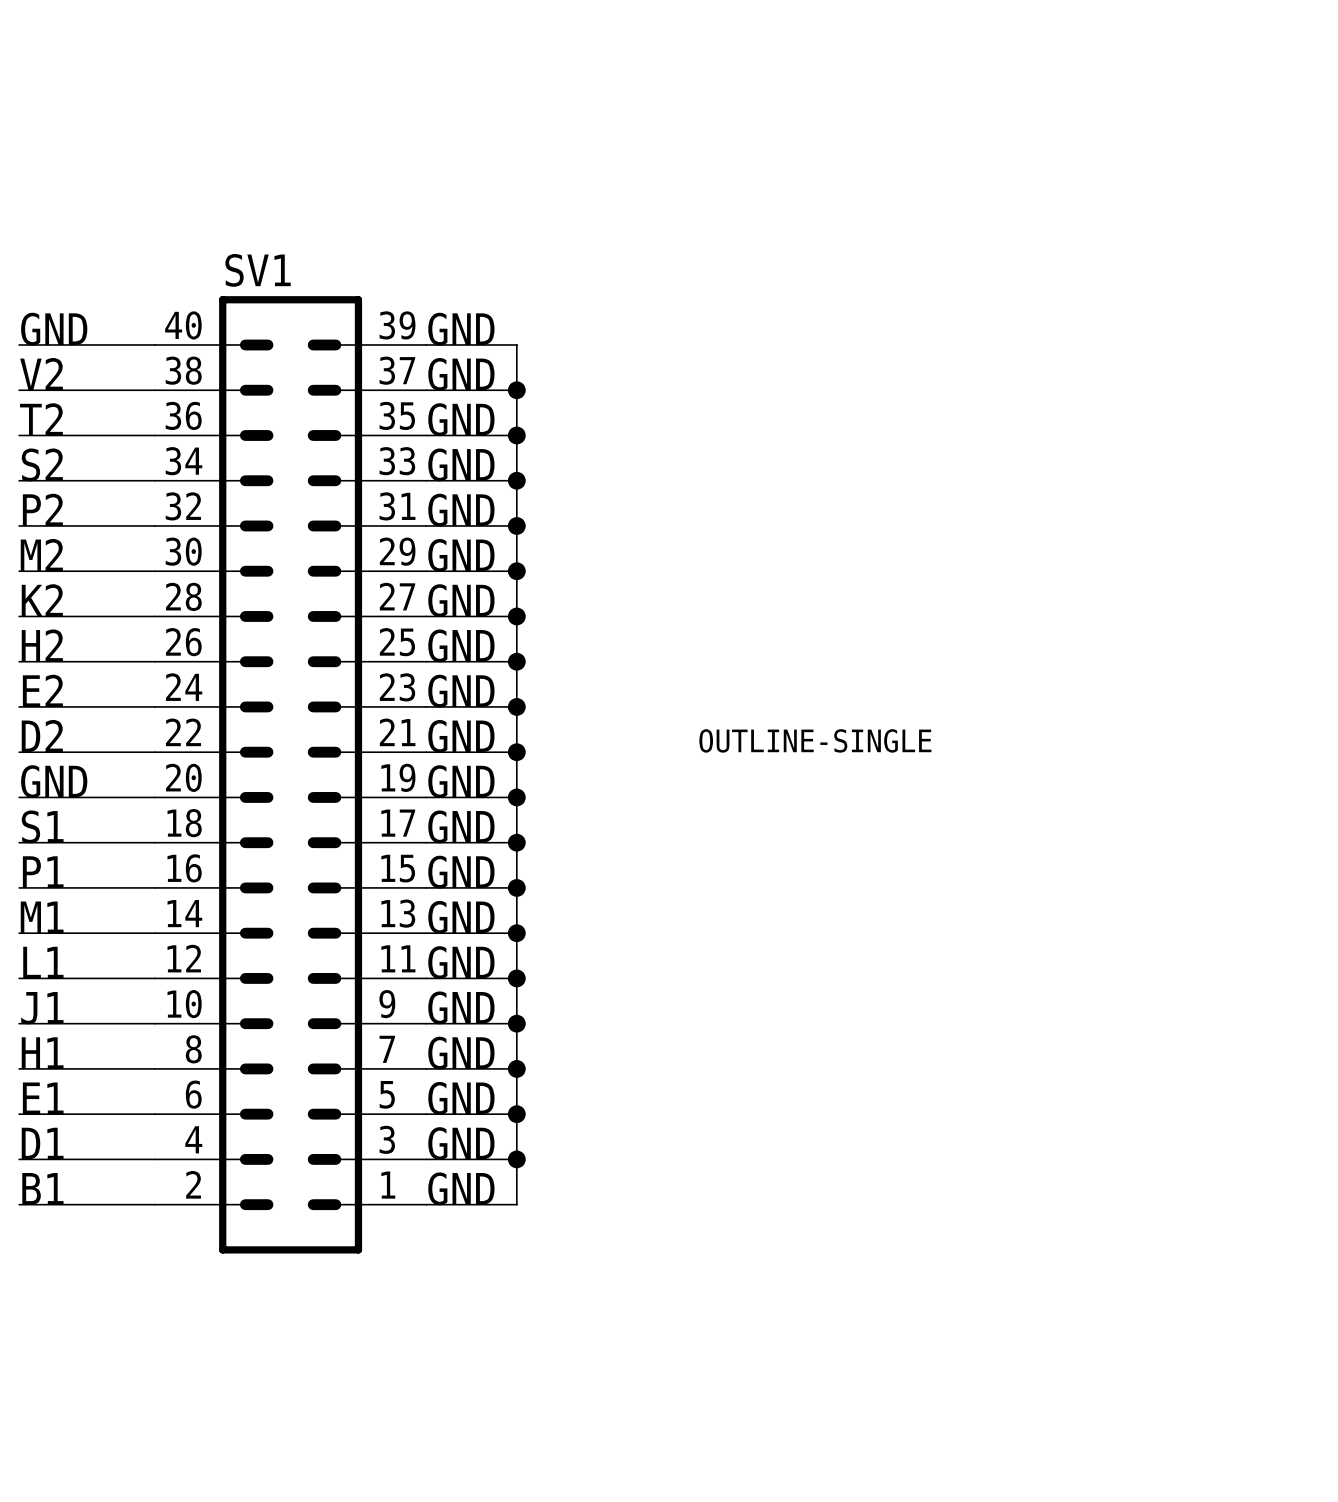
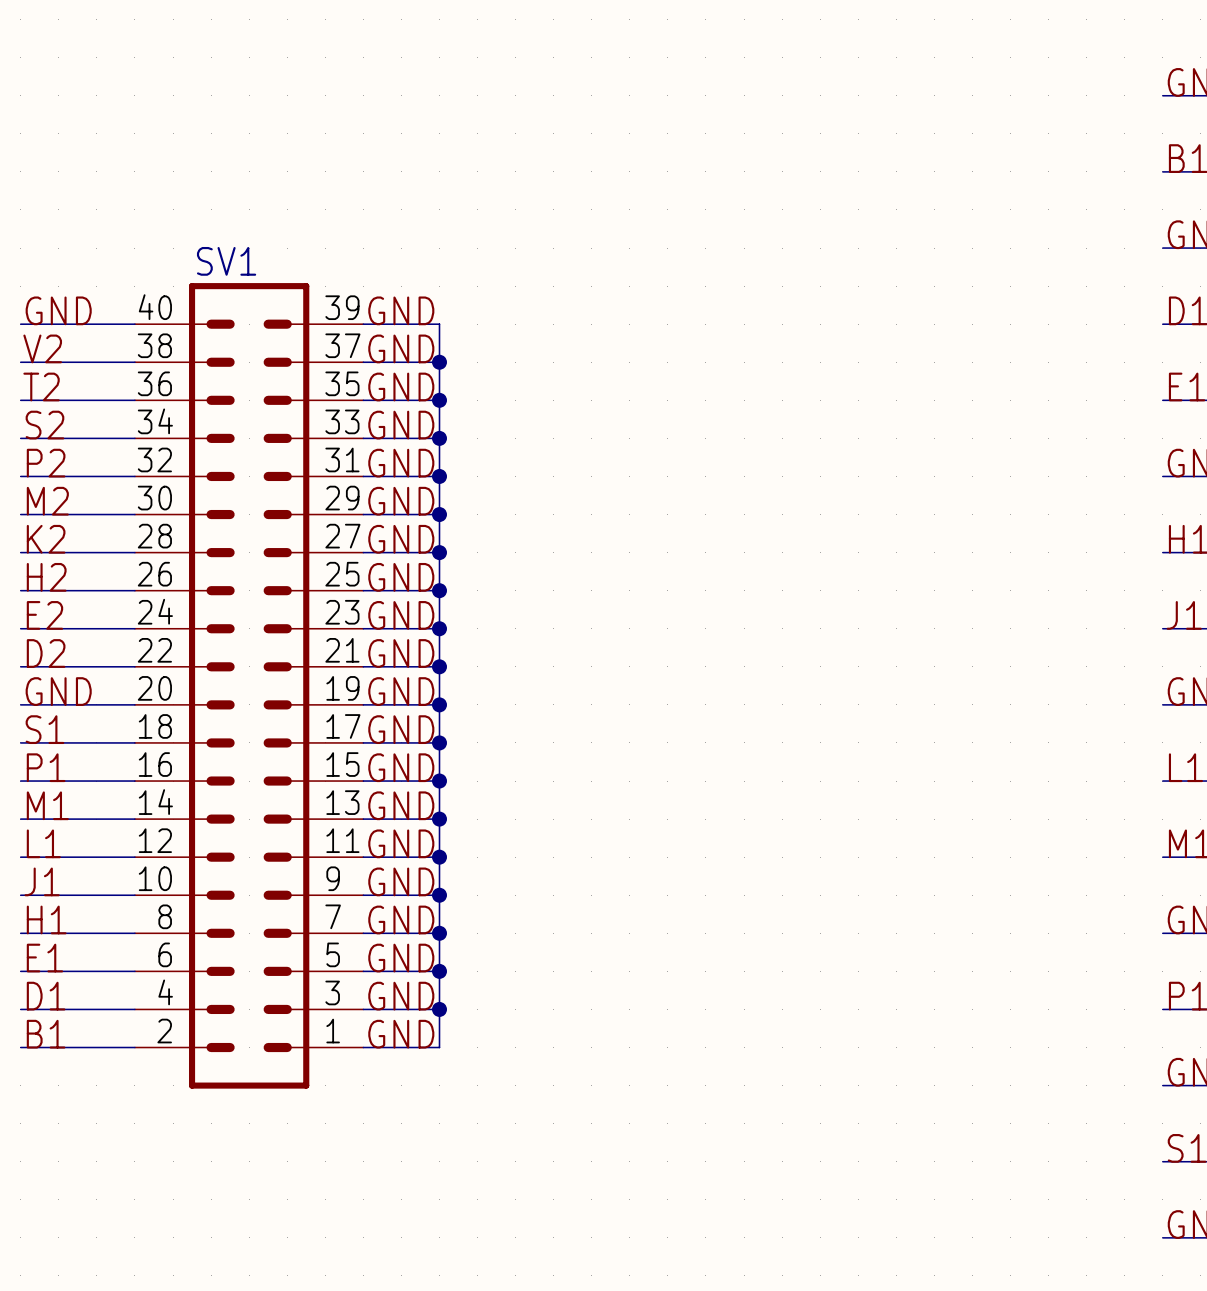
part: OUTLINE-SINGLE (815, 740) -> none

